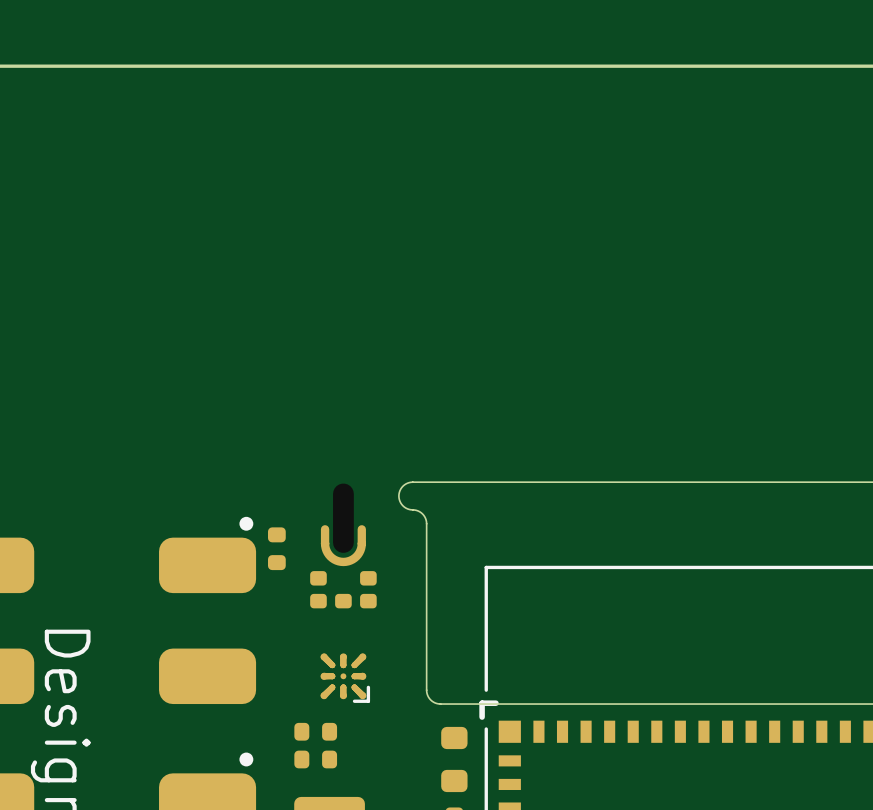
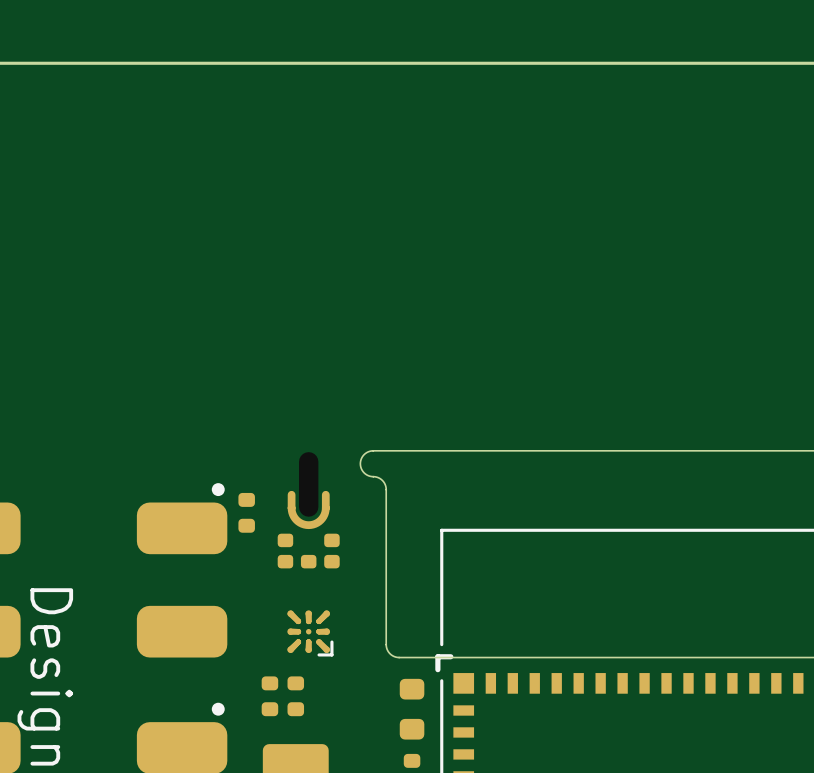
part: (315, 731) -> none
part: none -> (269, 696)
part: none -> (295, 696)
part: (315, 759) -> none

